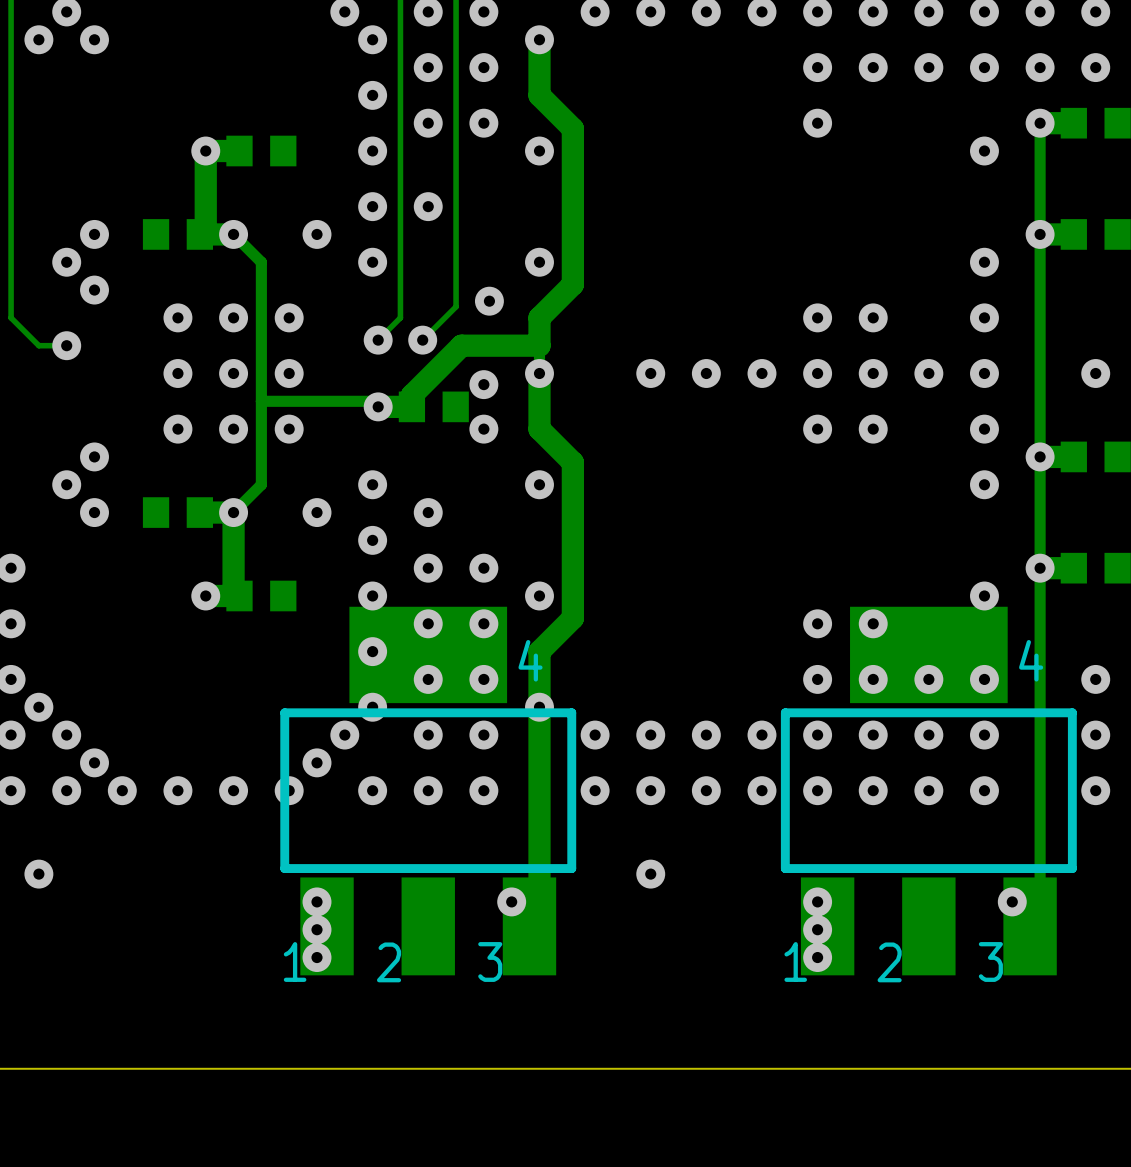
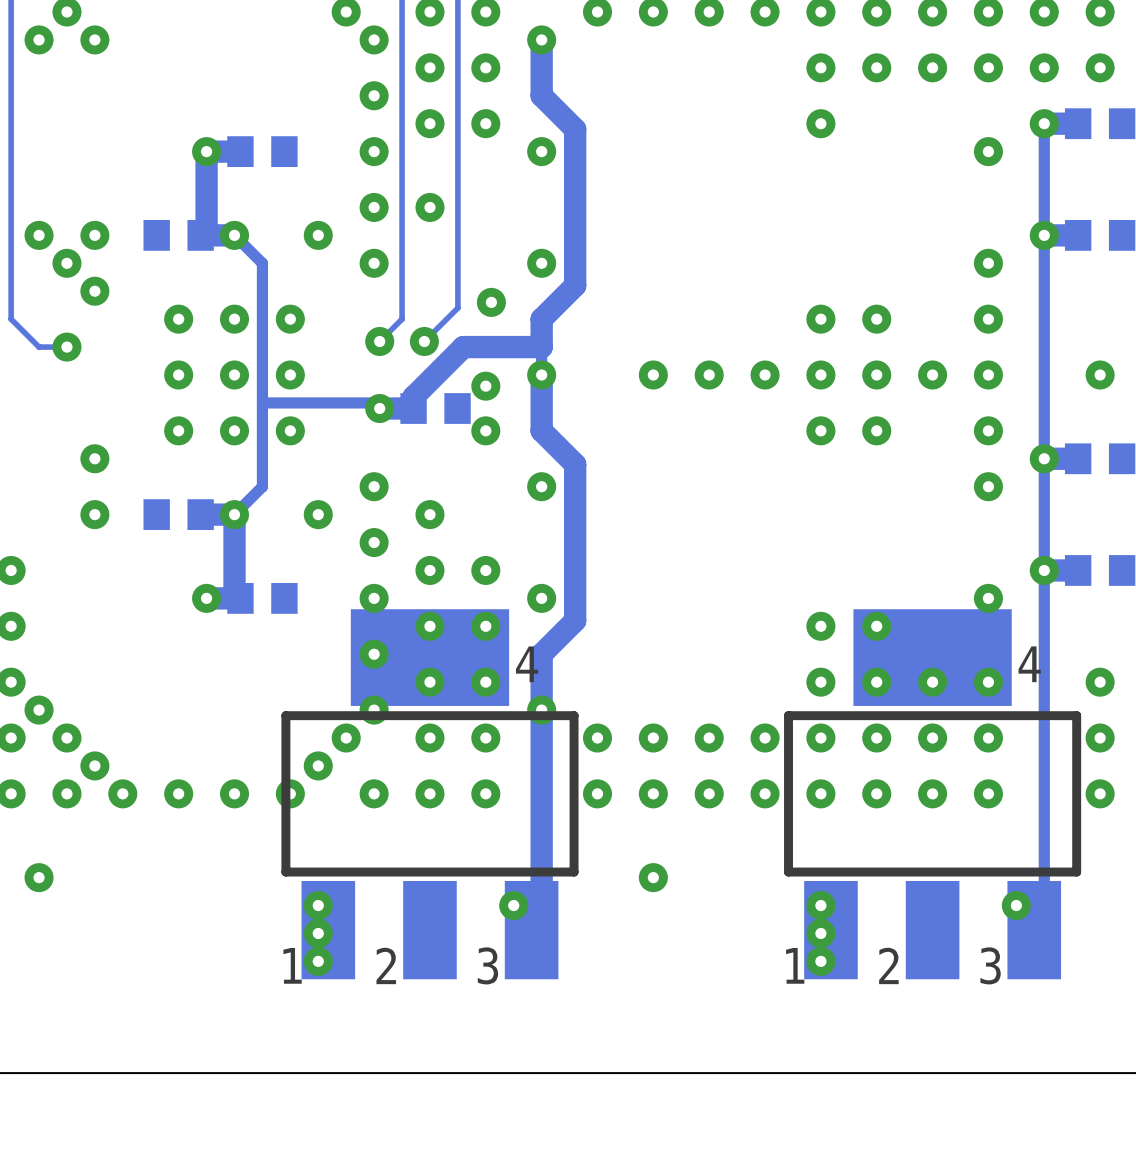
via: none -> (39, 235)
via: (66, 484) -> none

